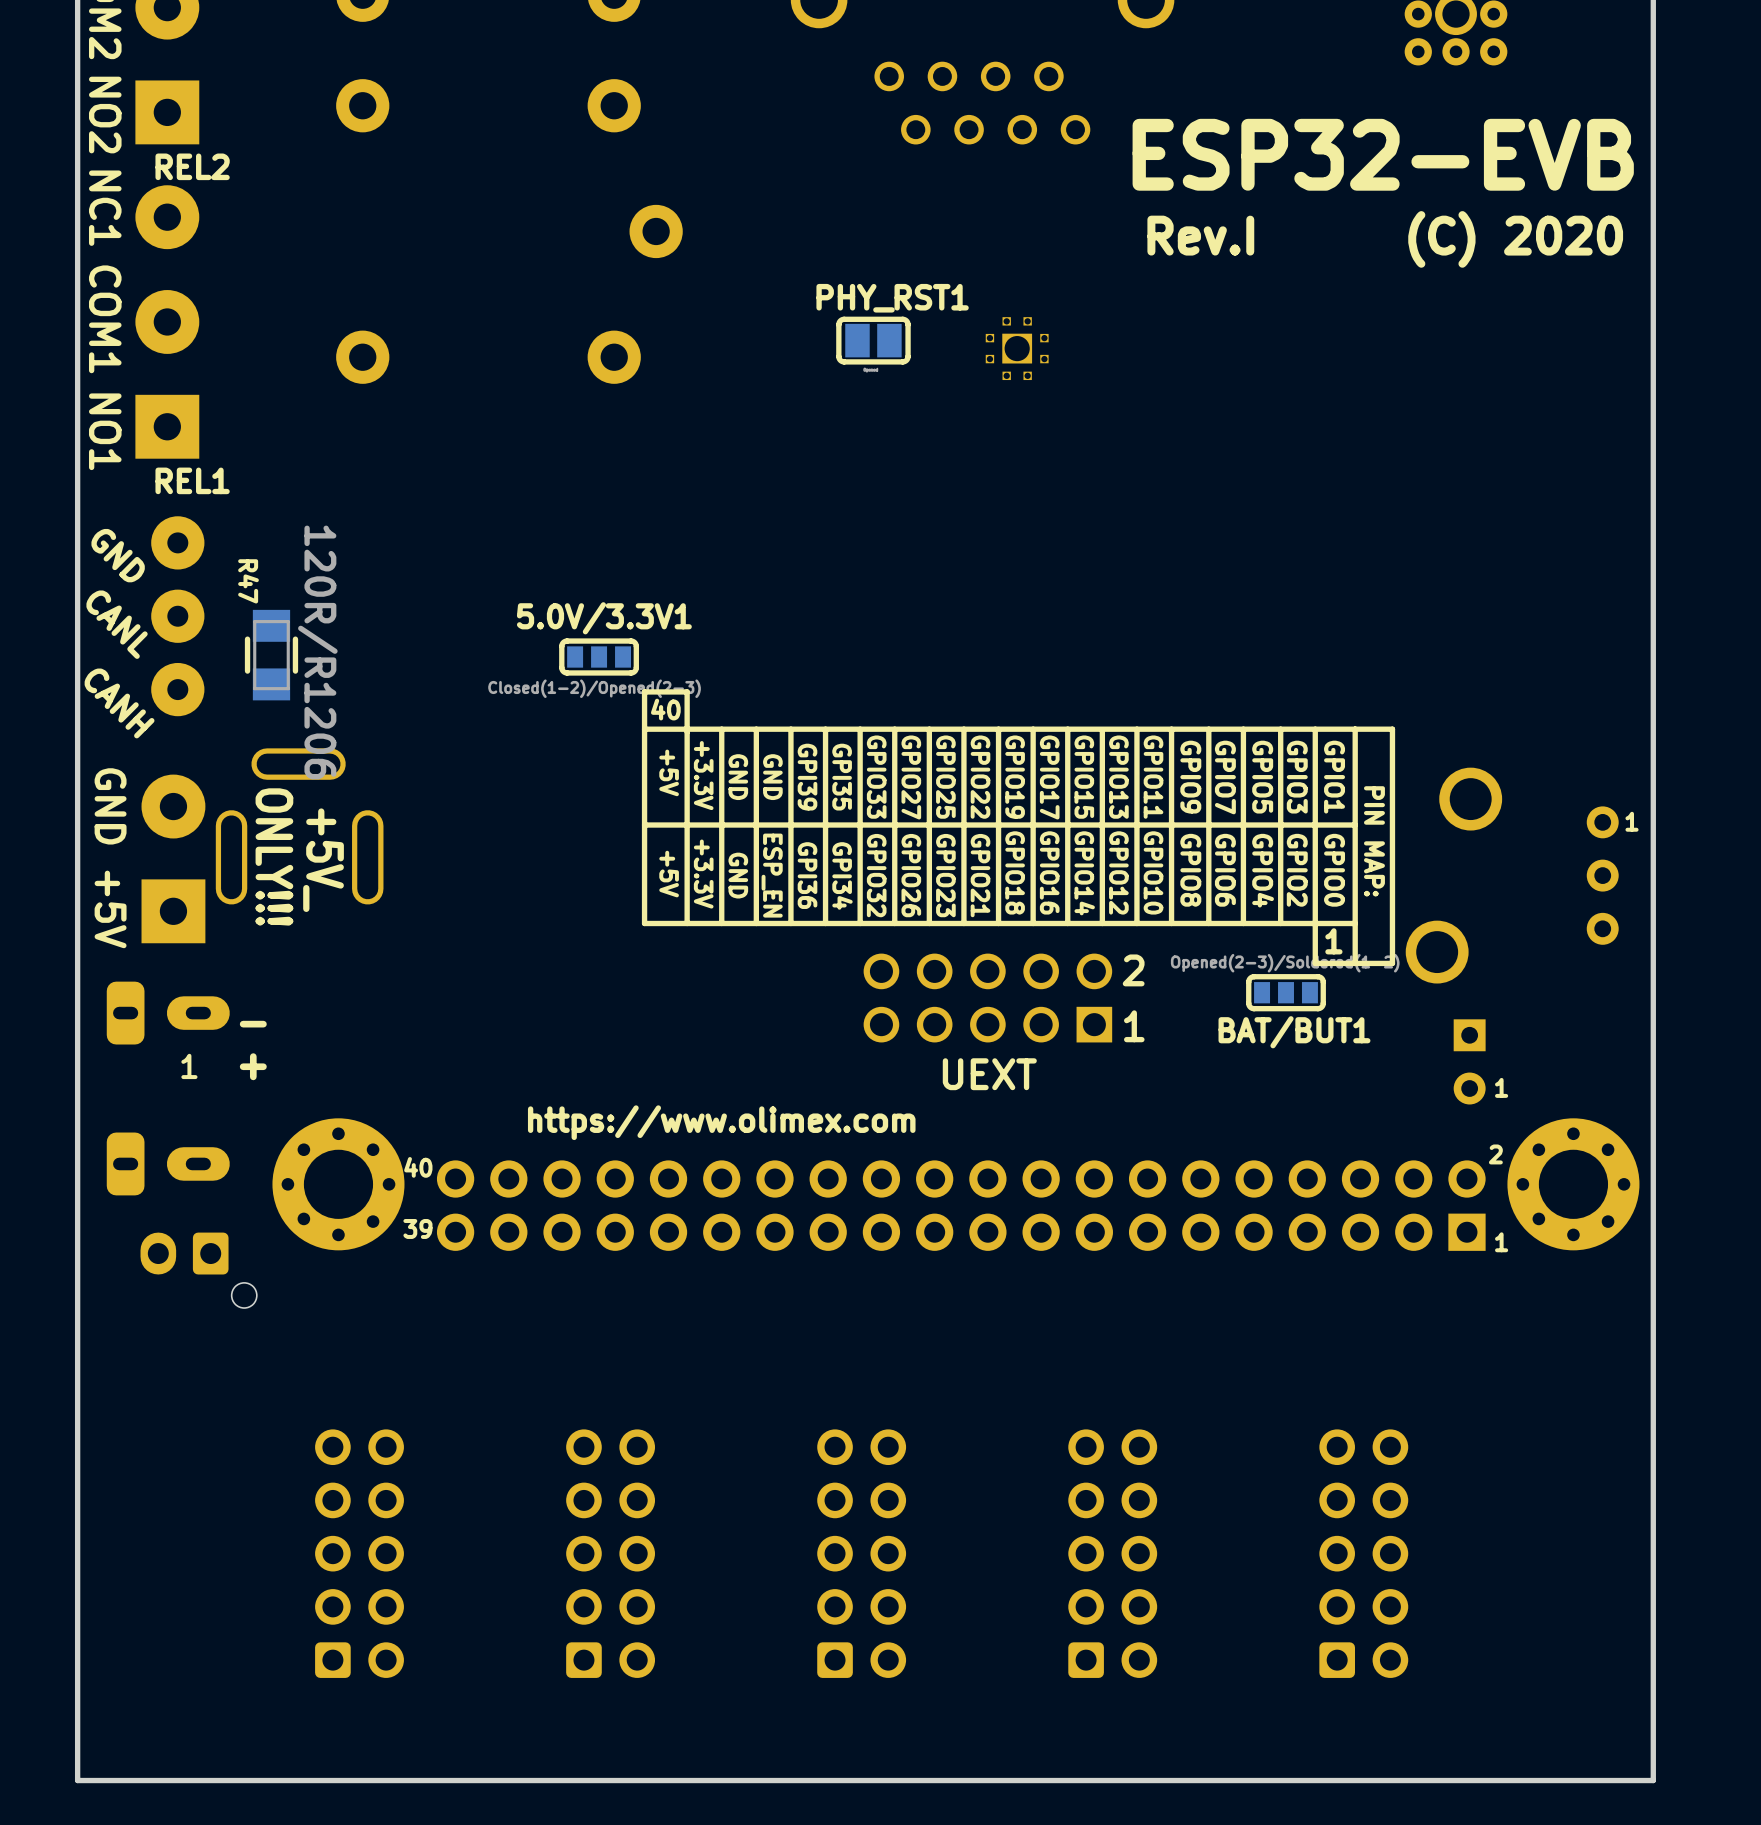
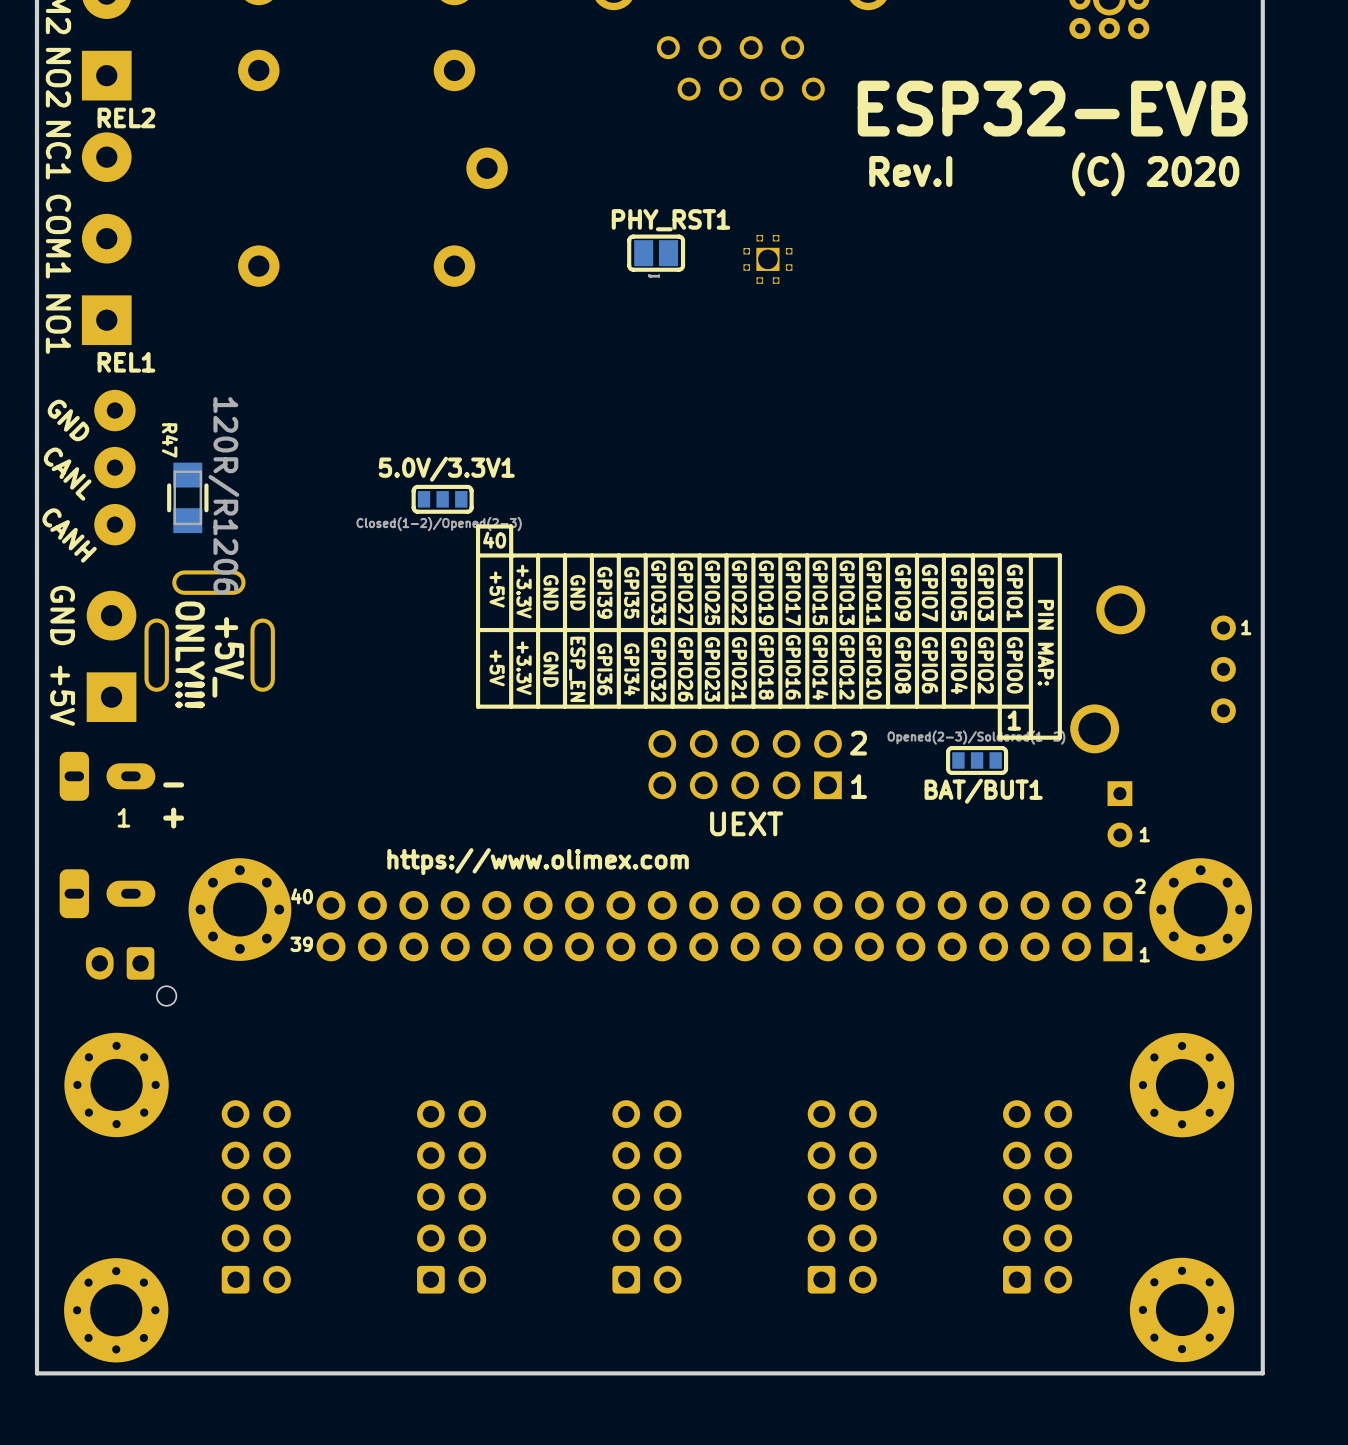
part: none -> (116, 1084)
part: none -> (1182, 1085)
part: none -> (116, 1310)
part: none -> (1182, 1309)

